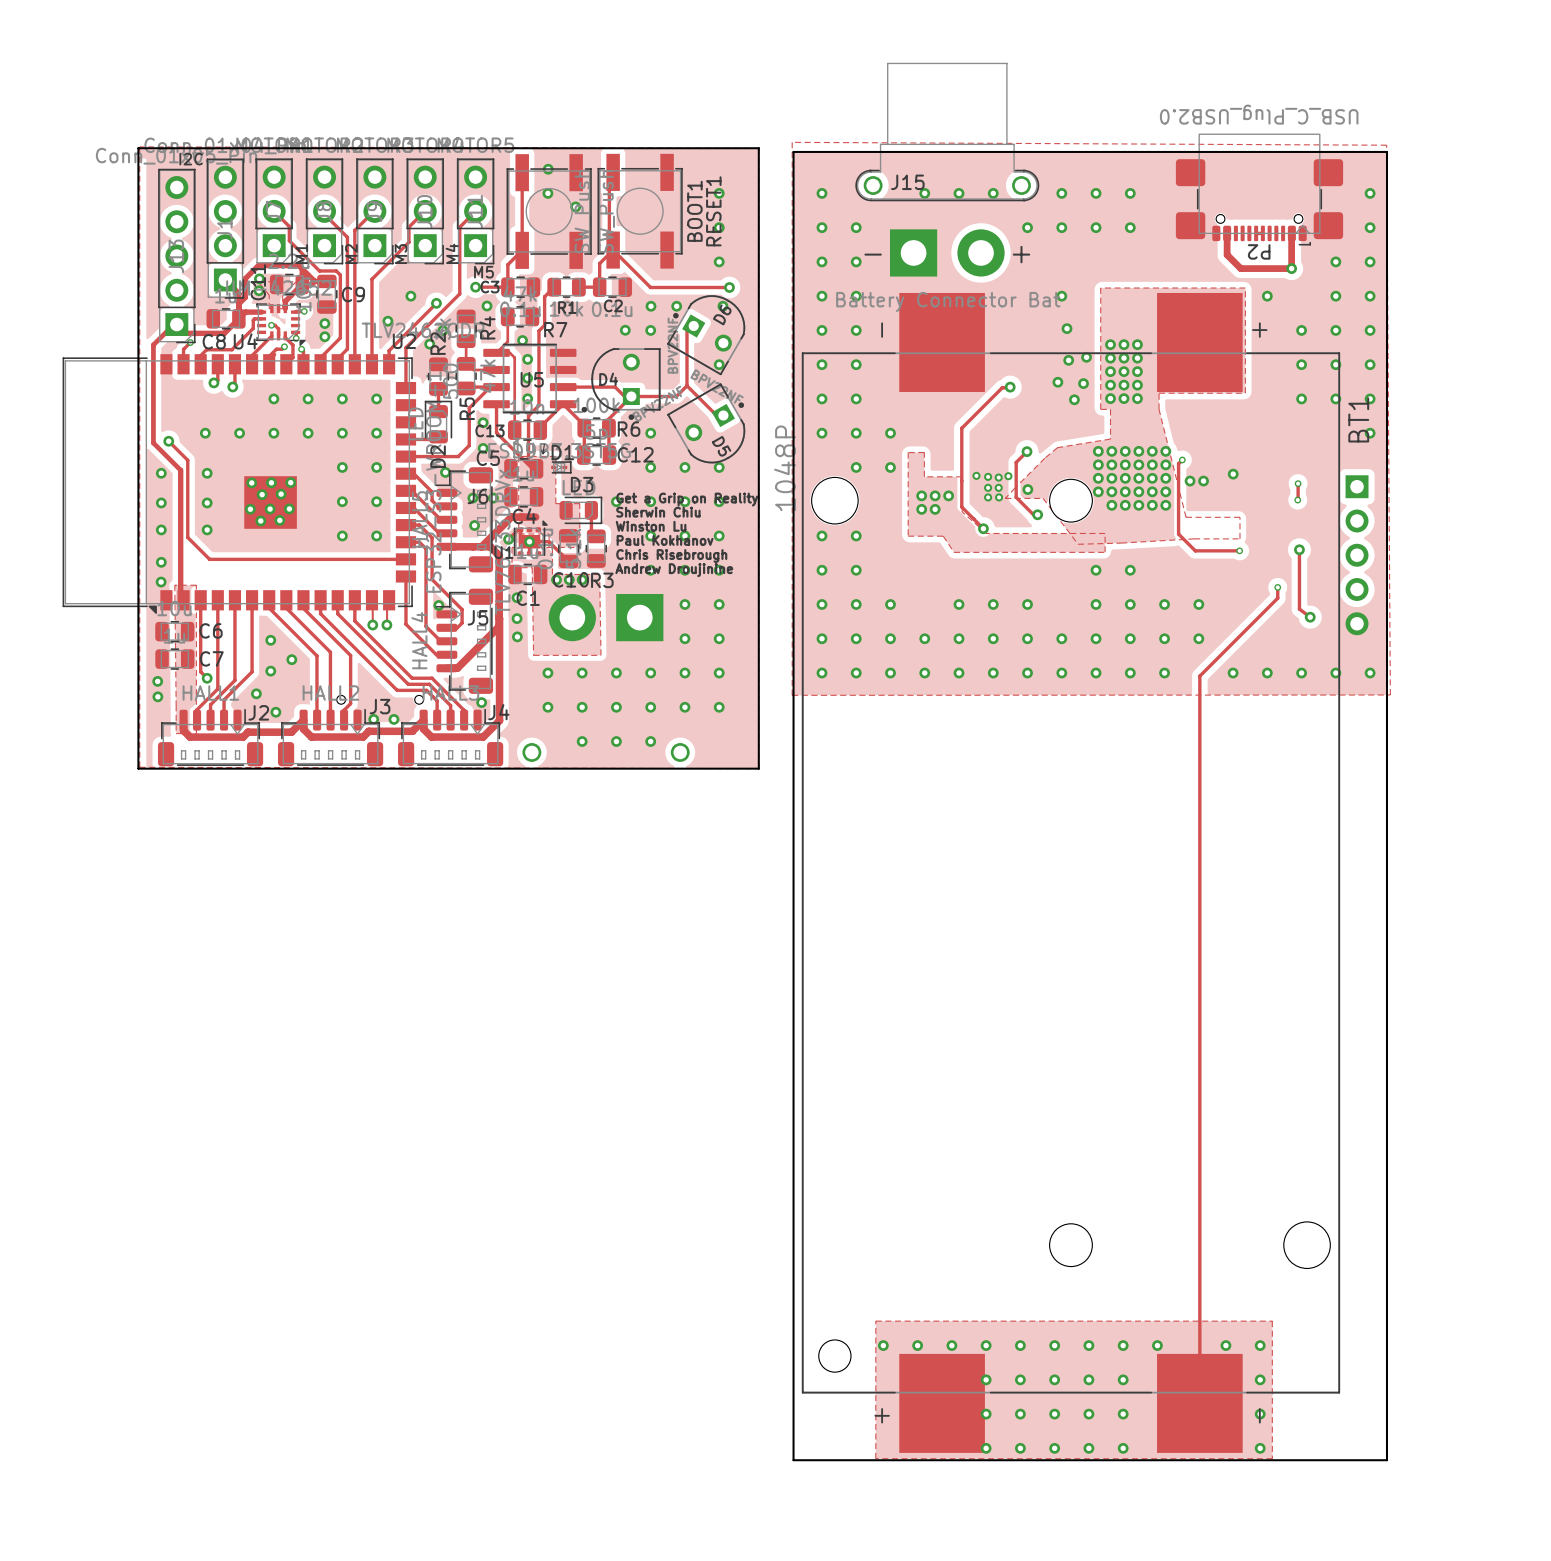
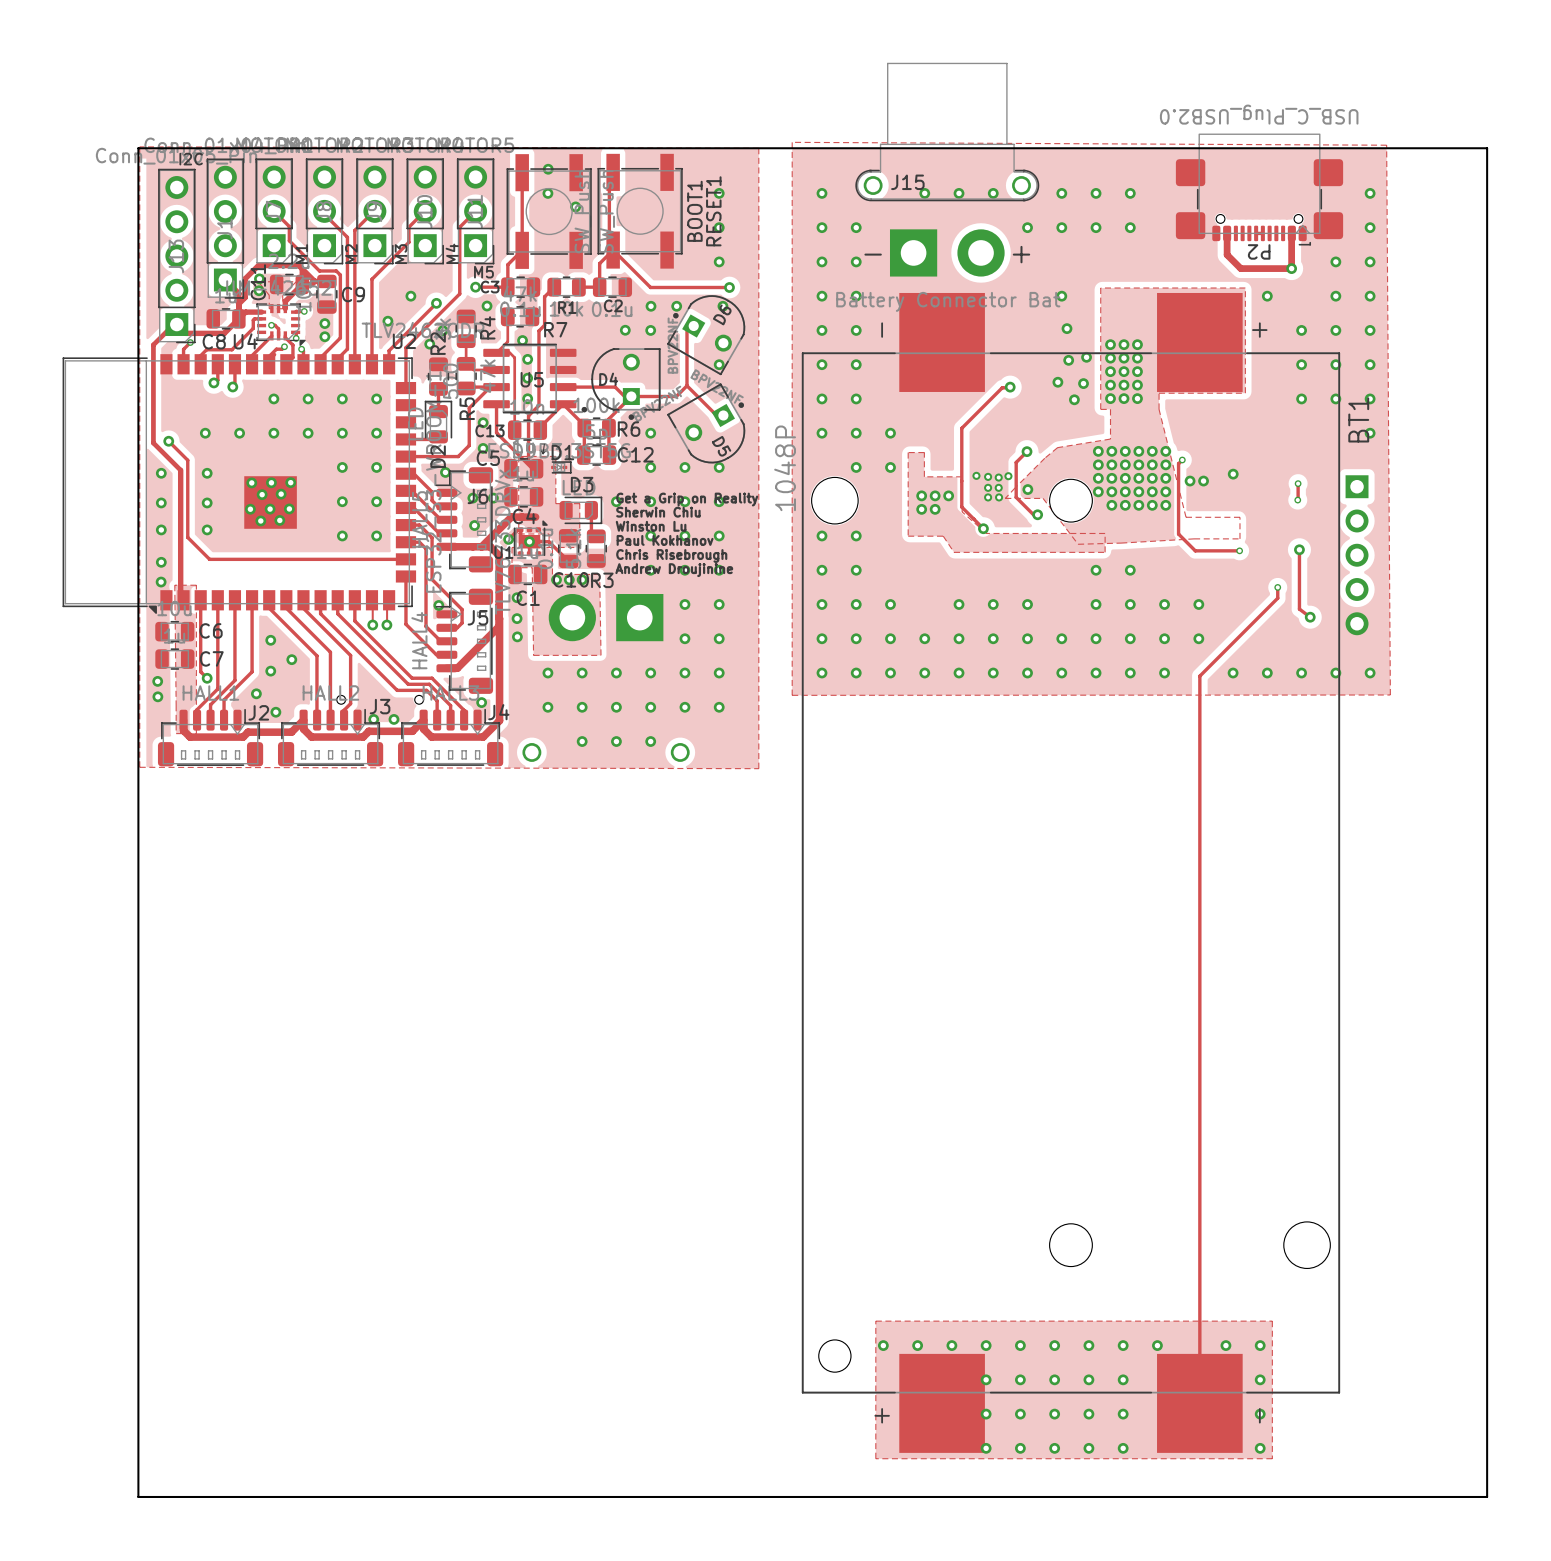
board edge: (758, 148) (758, 768) (138, 768) -> (758, 148) (1487, 148) (1487, 1496) (138, 1496) (138, 768)
board edge: (793, 151) (1386, 151) (1386, 1460) (793, 1460) (793, 151) -> none

